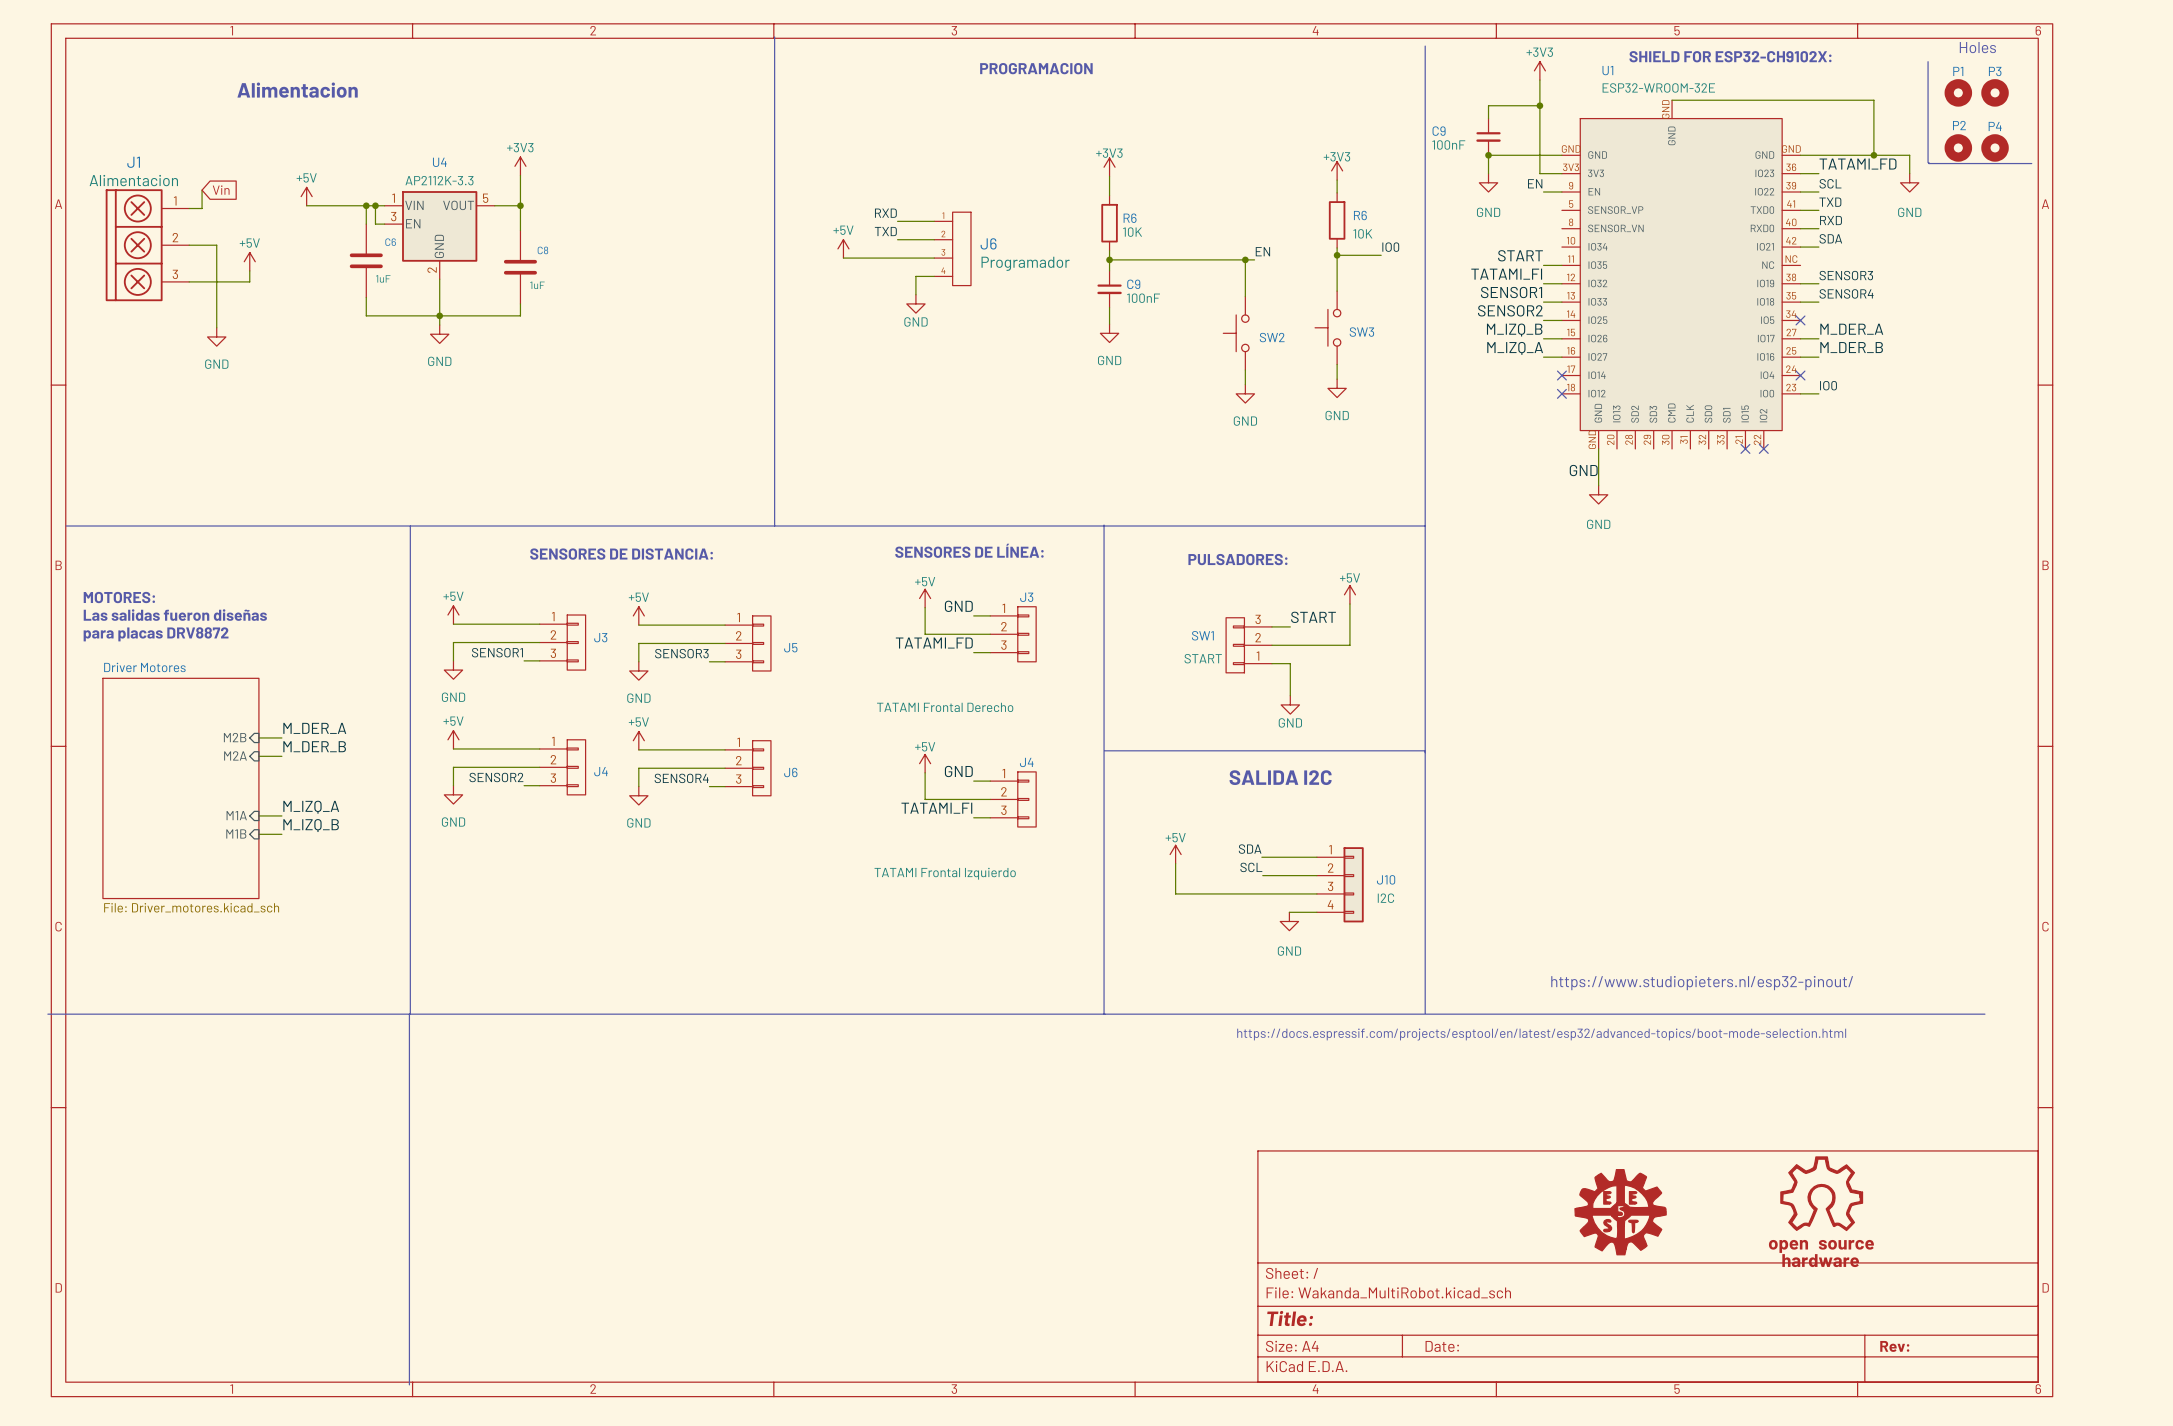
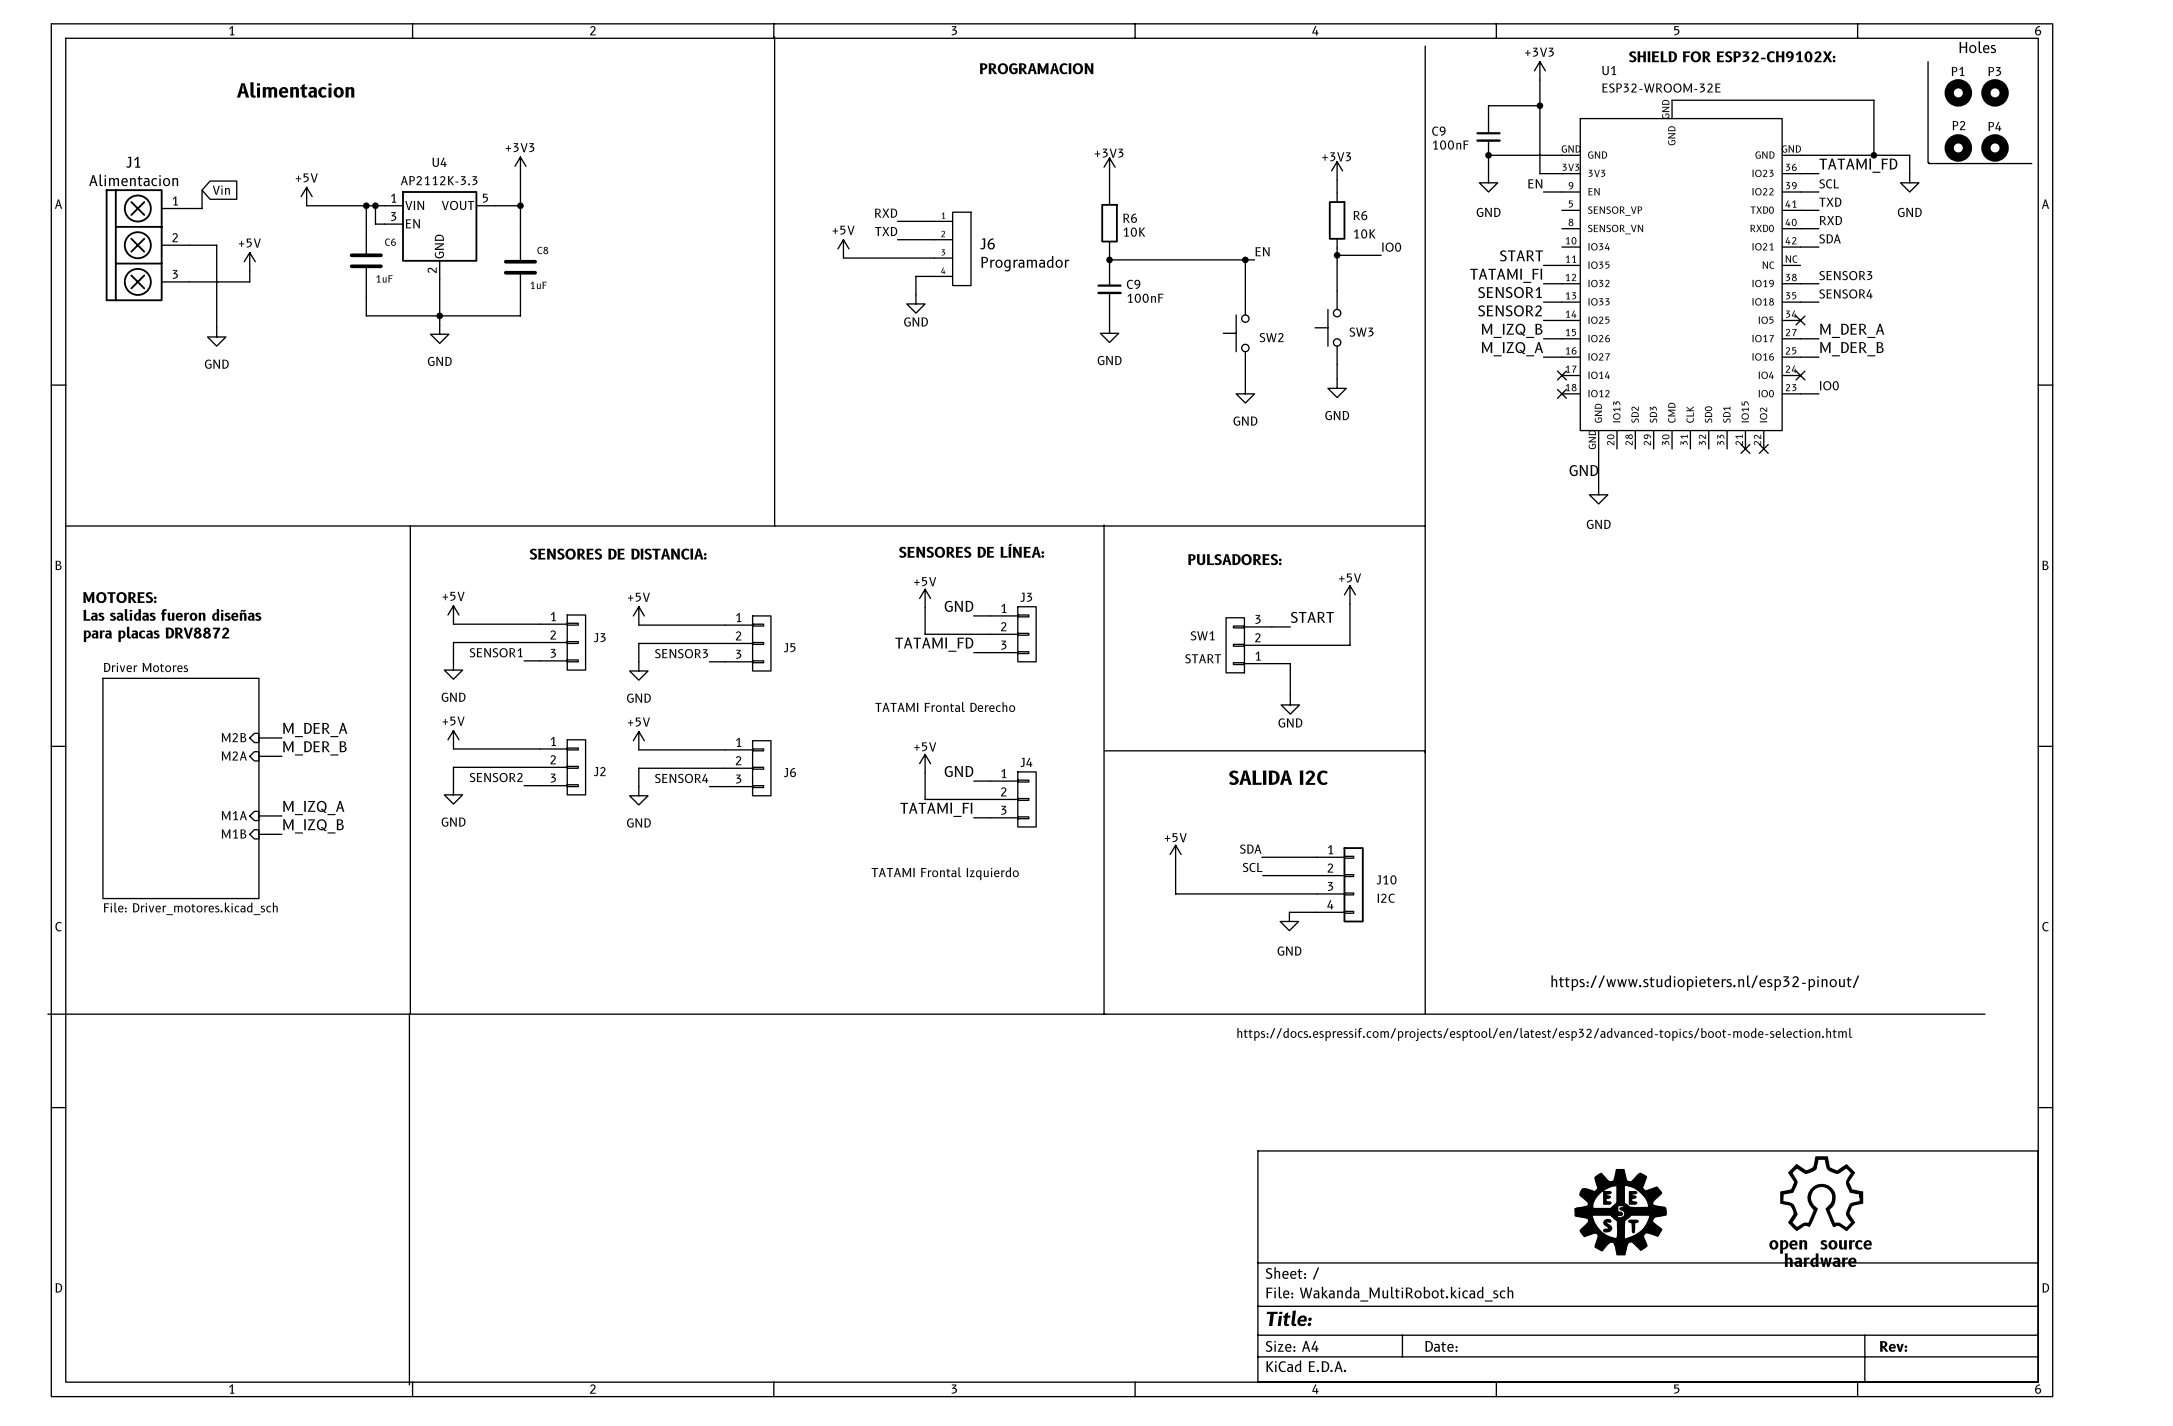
J4 name: J4 (601, 771) -> J2 (599, 771)

